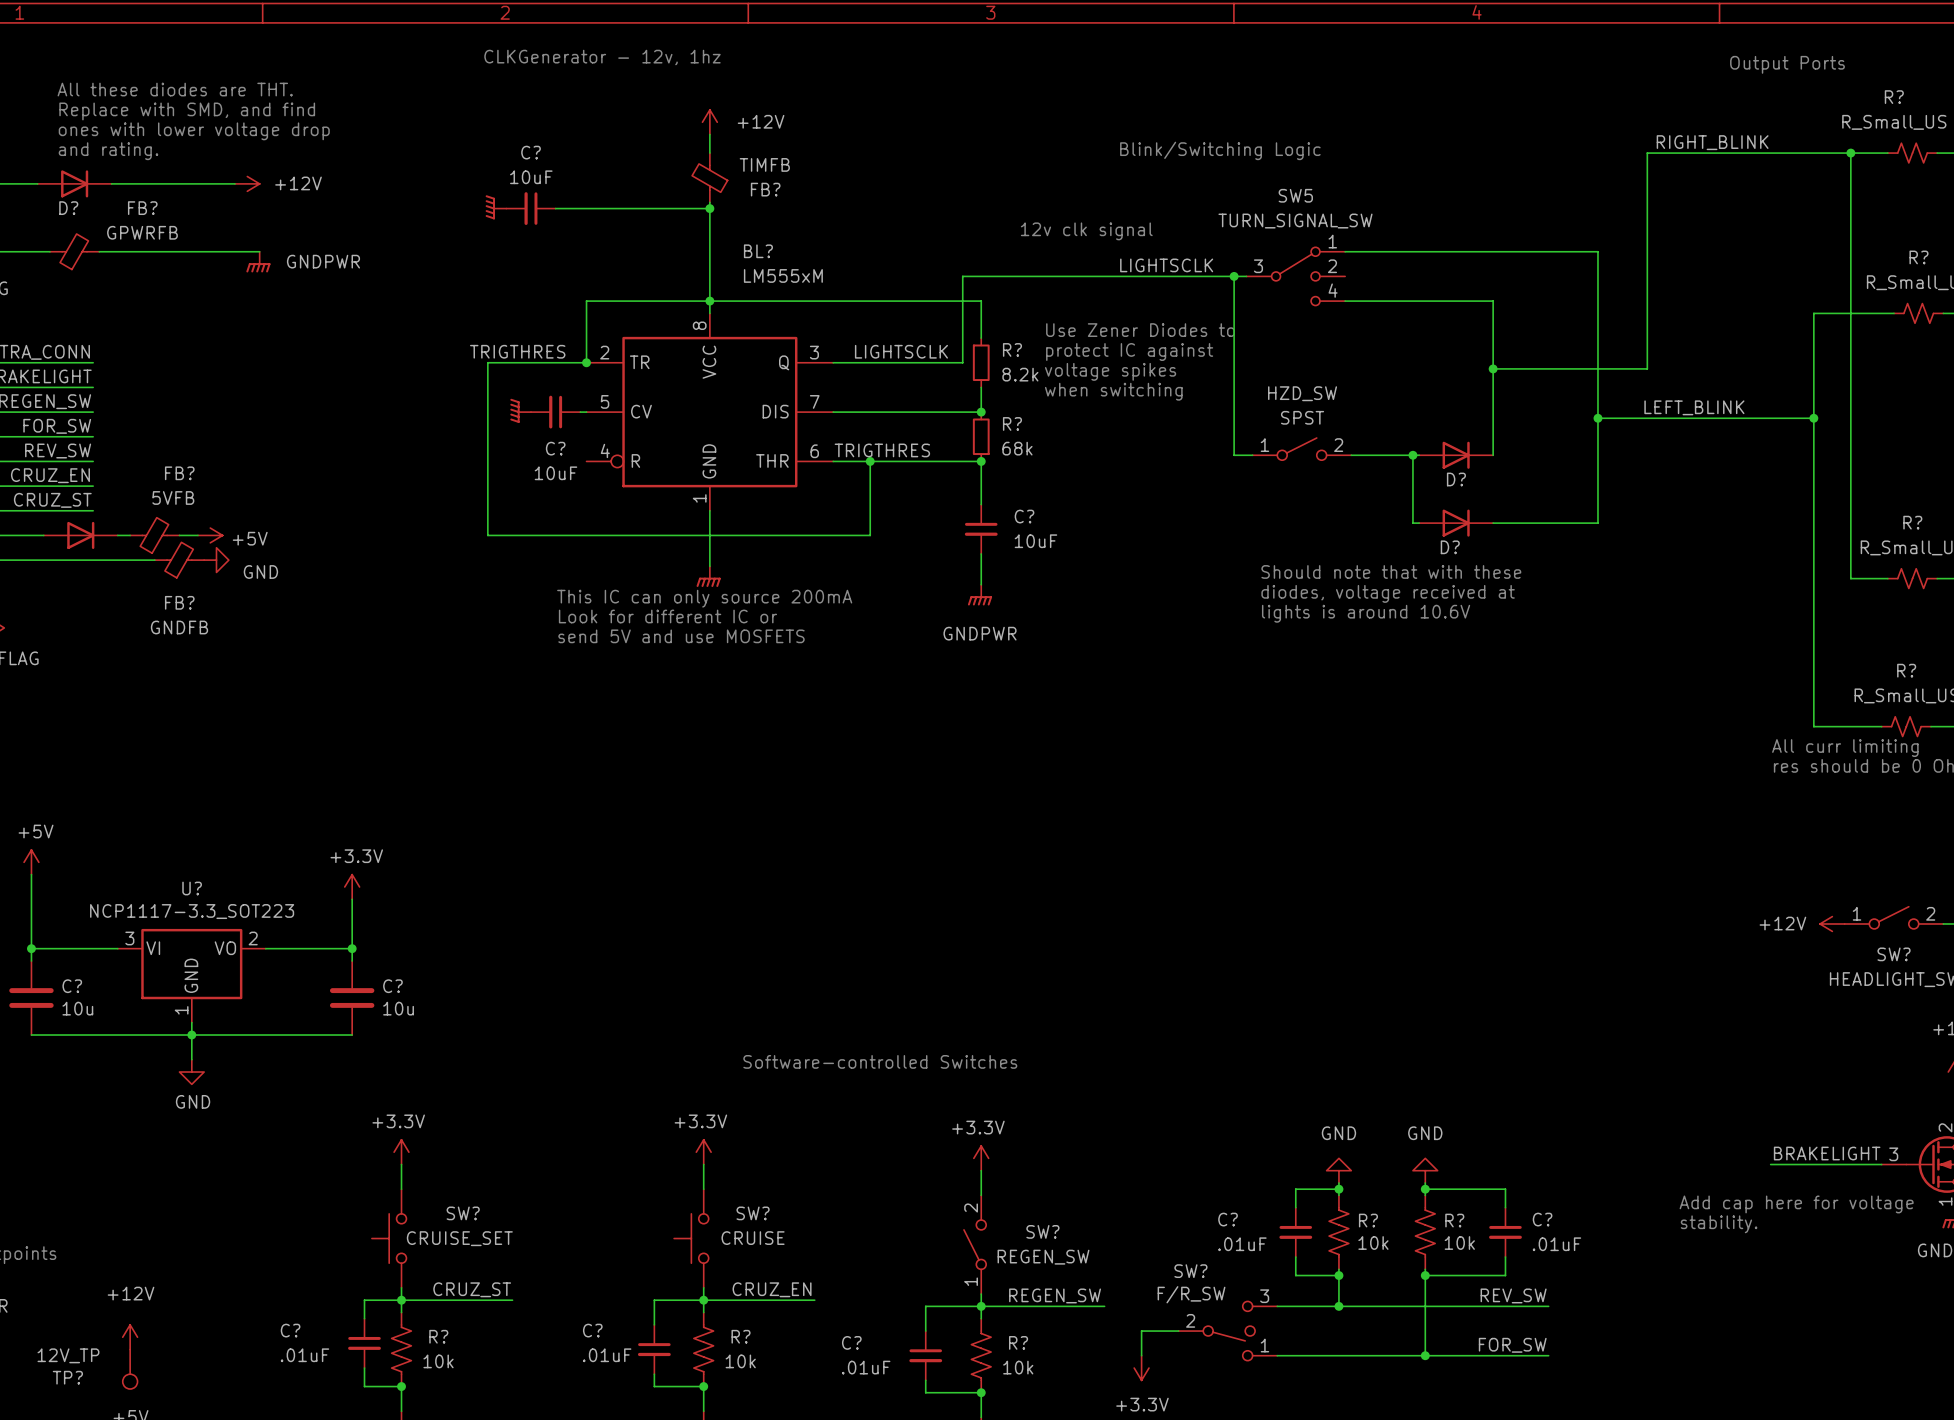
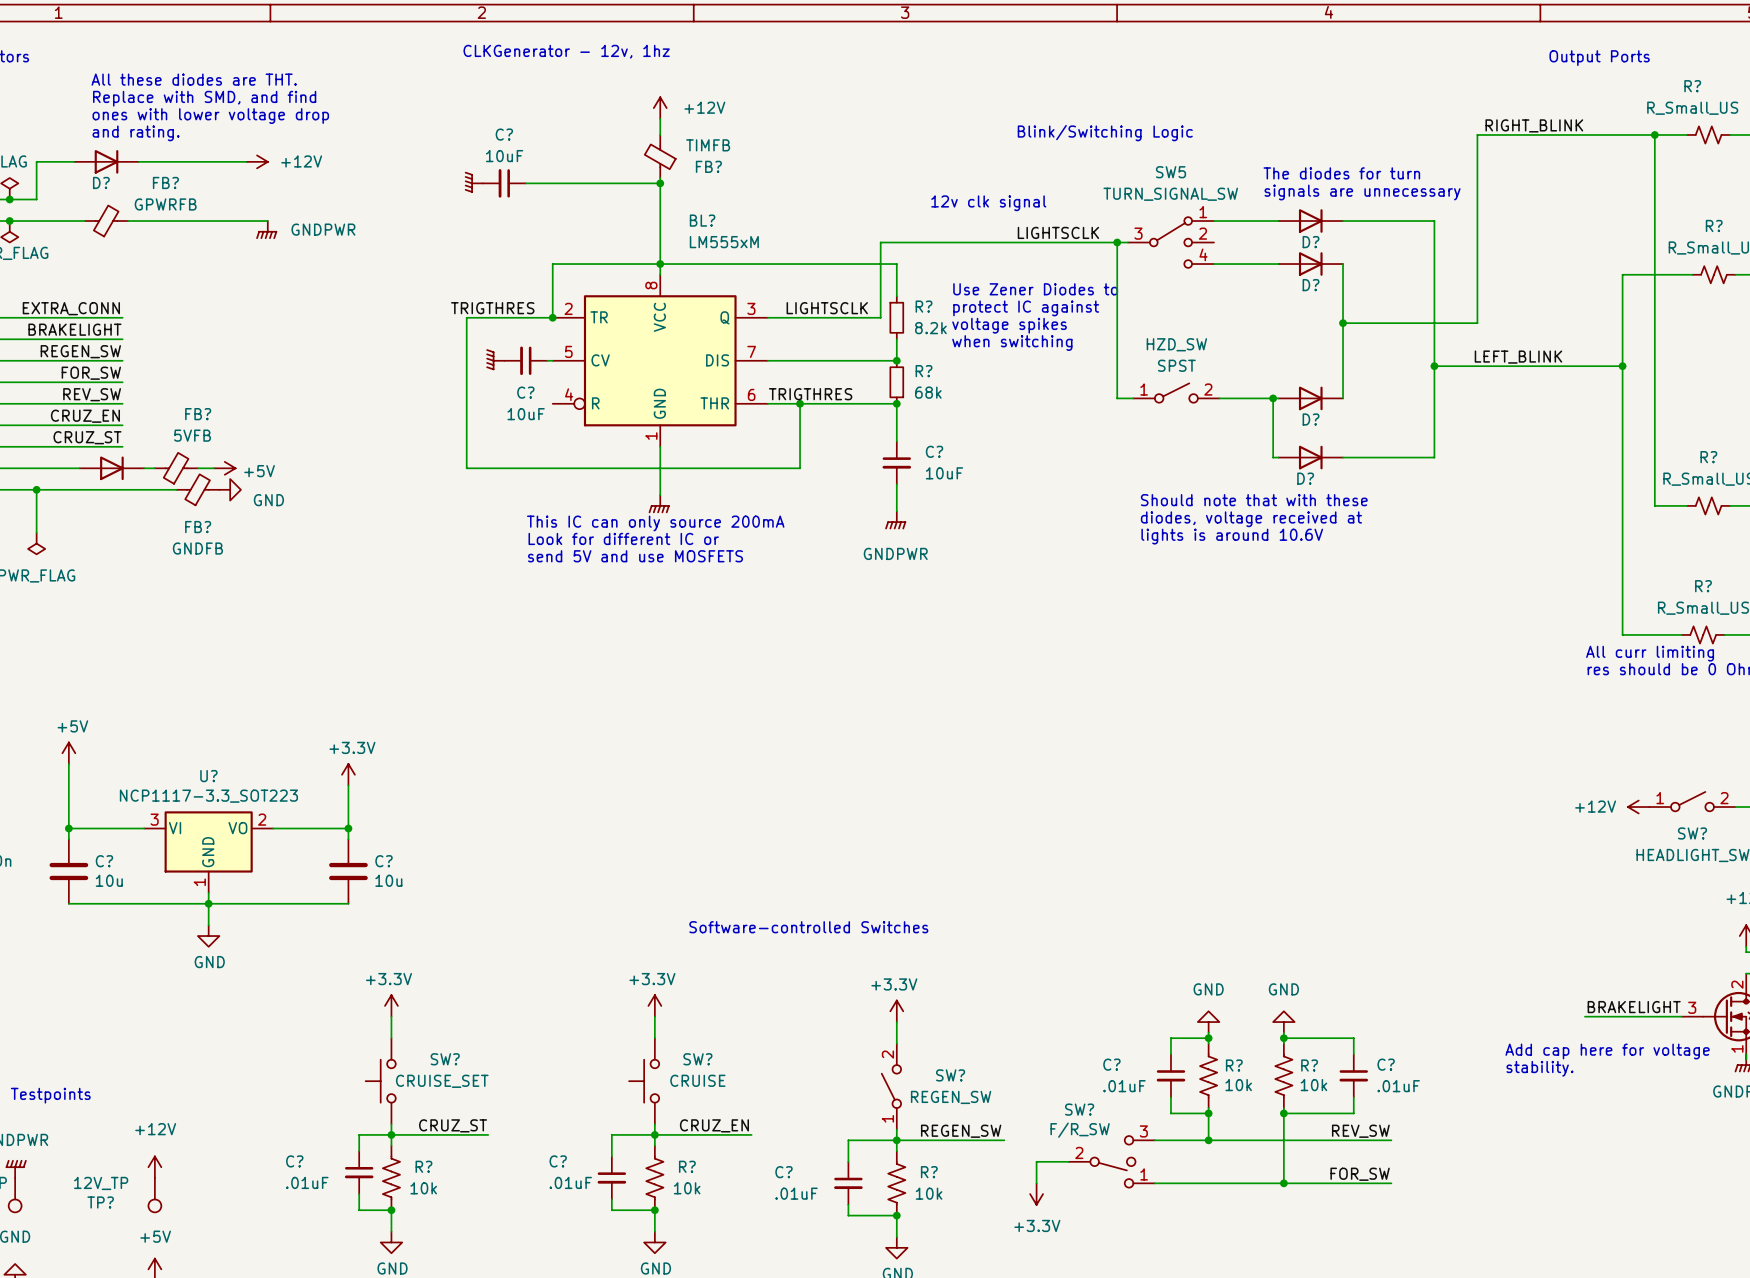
text: none -> The diodes for turn (1341, 173)
text: none -> signals are unnecessary (1362, 192)
D?: none -> (1310, 221)
D?: none -> (1310, 264)

